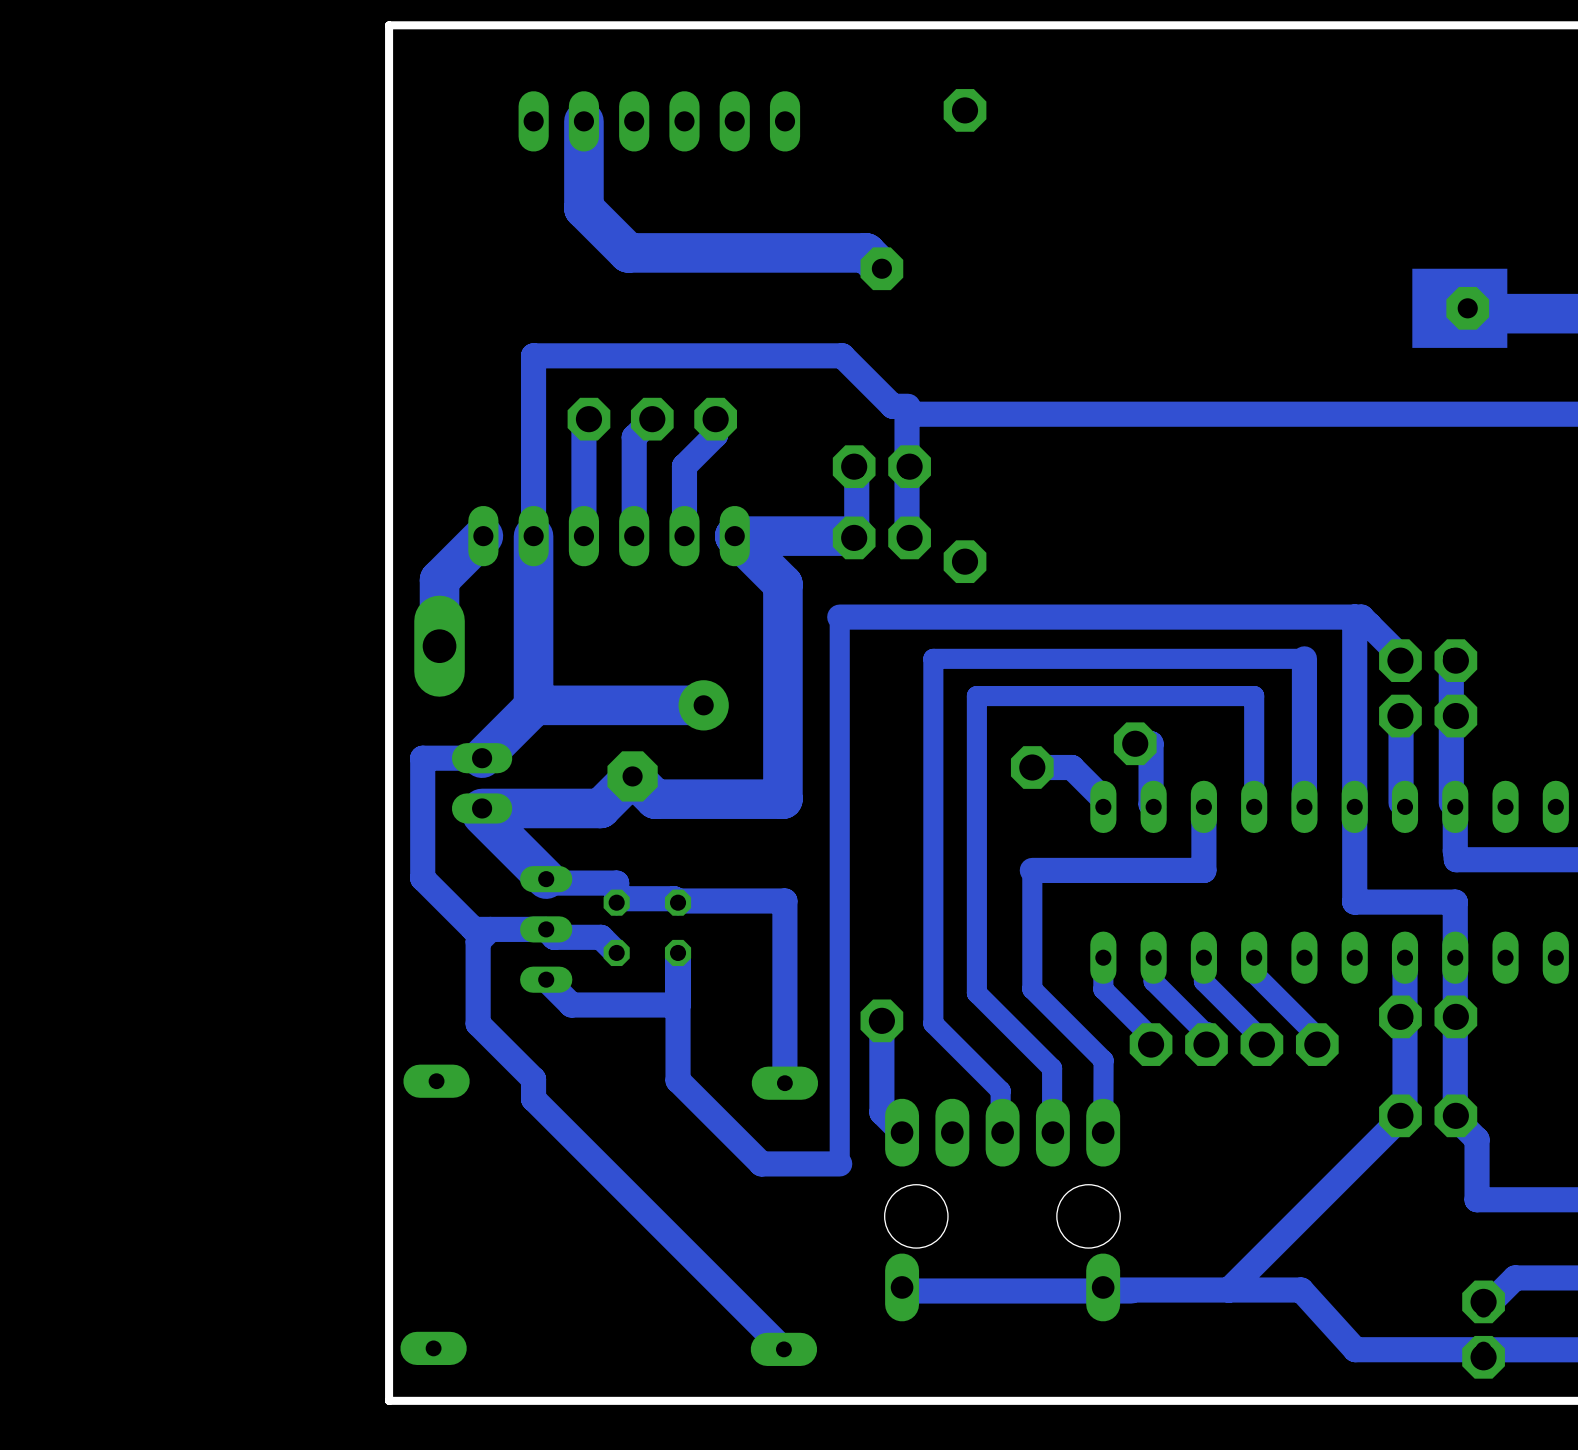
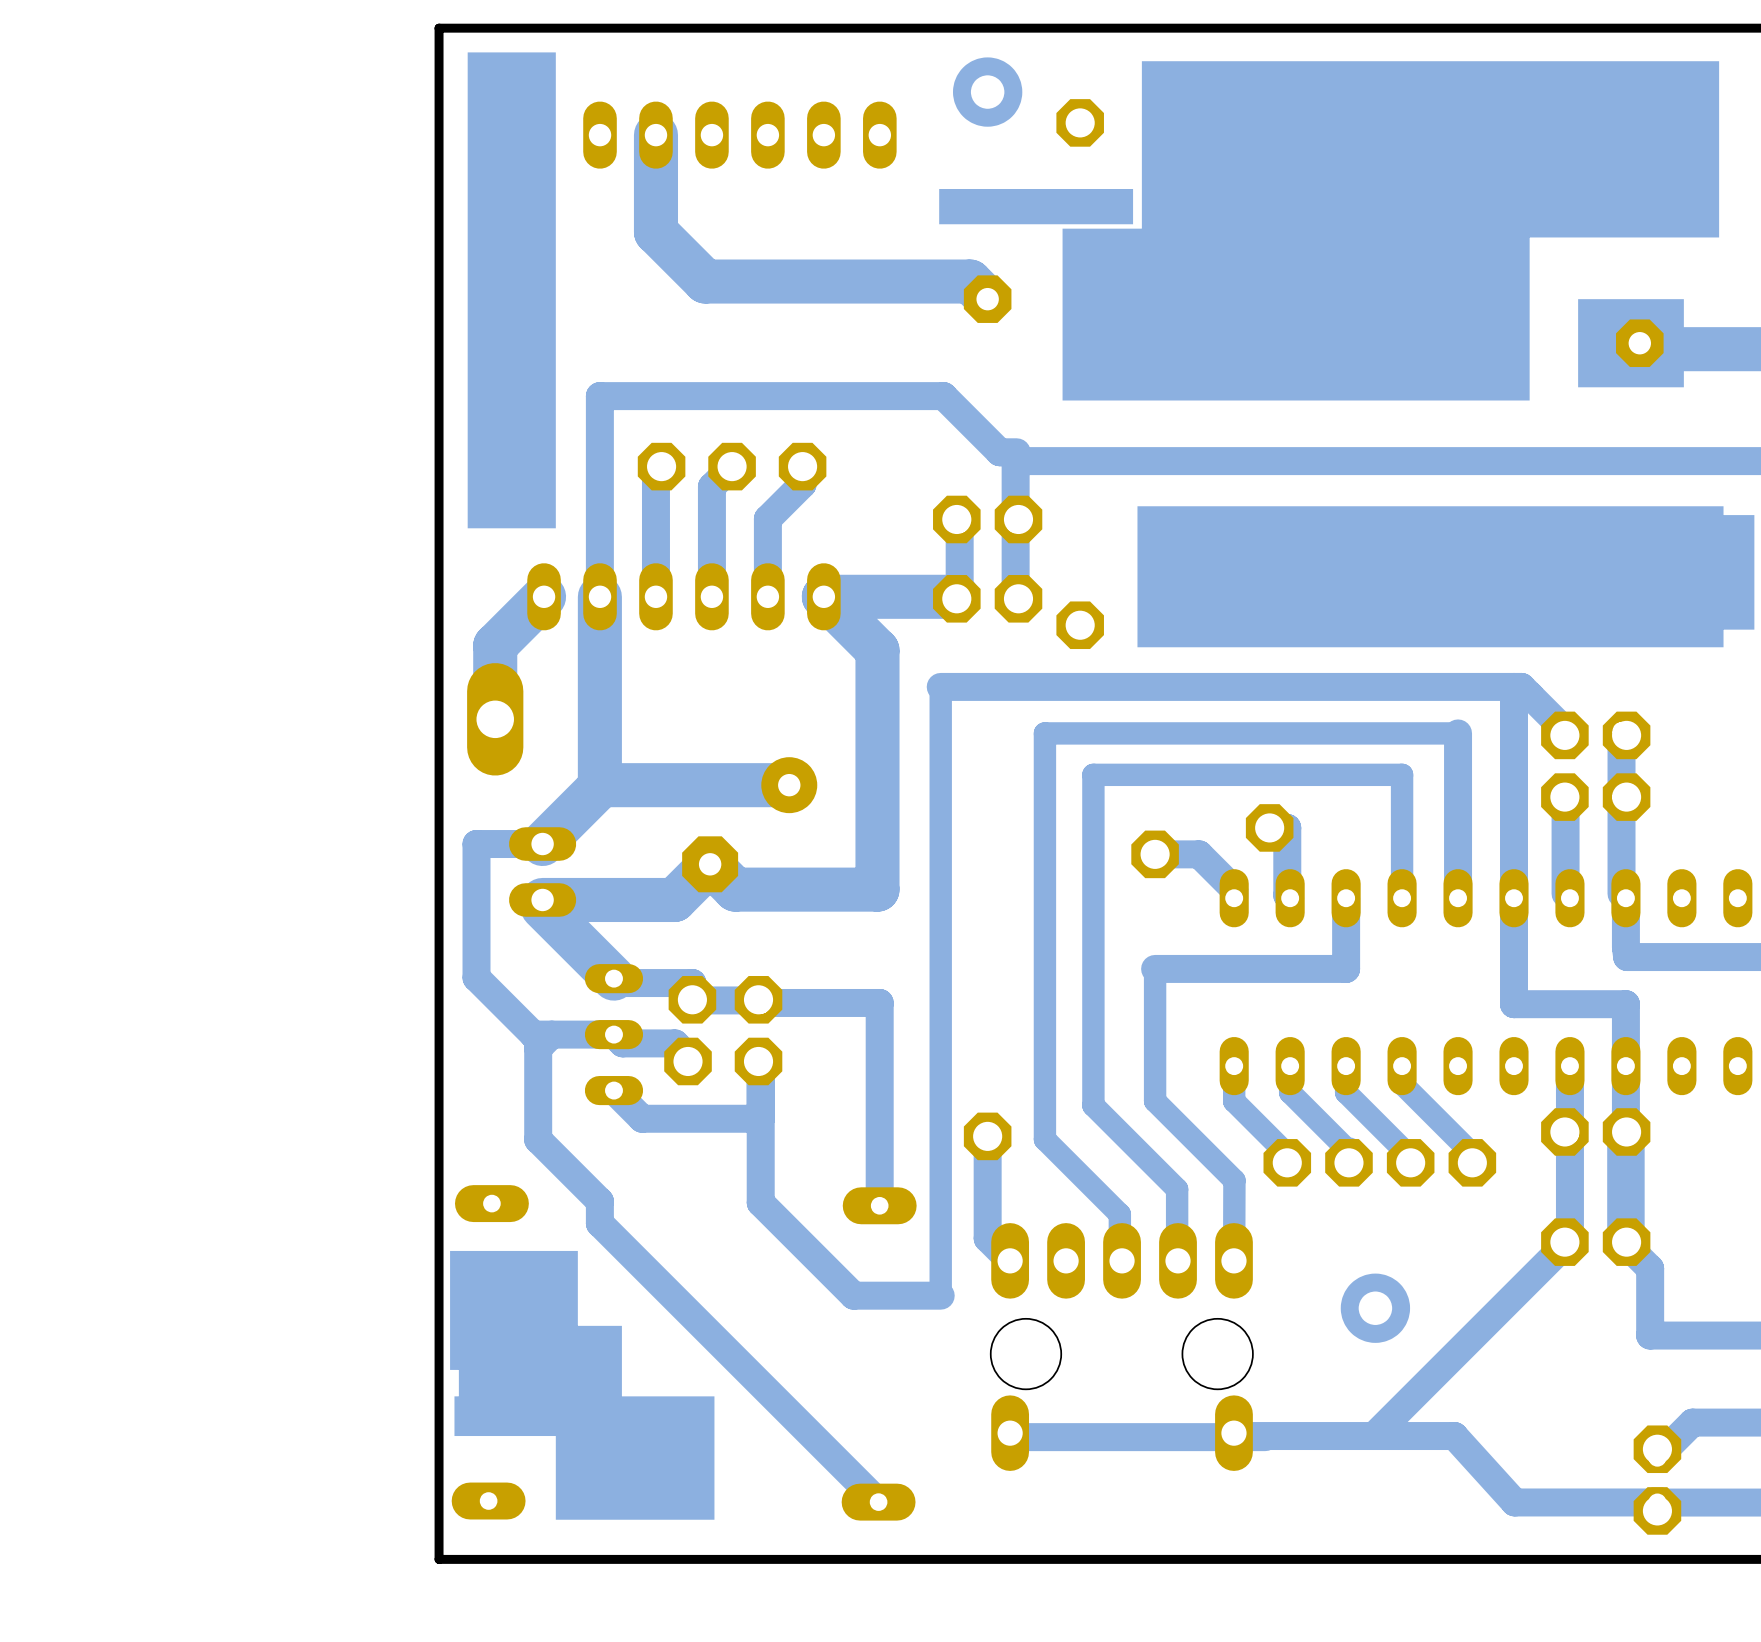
drawing: none -> [467, 52, 556, 529]
drawing: none -> [953, 57, 1023, 127]
drawing: none -> [939, 61, 1720, 401]
drawing: none -> [1137, 506, 1755, 648]
part: none -> (692, 999)
part: none -> (758, 999)
part: none -> (688, 1061)
part: none -> (758, 1061)
bottom track width: thin (1455, 1018) (1455, 1113) -> thick (1625, 1134) (1625, 1239)
drawing: none -> [450, 1250, 715, 1520]
drawing: none -> [1340, 1273, 1411, 1343]

